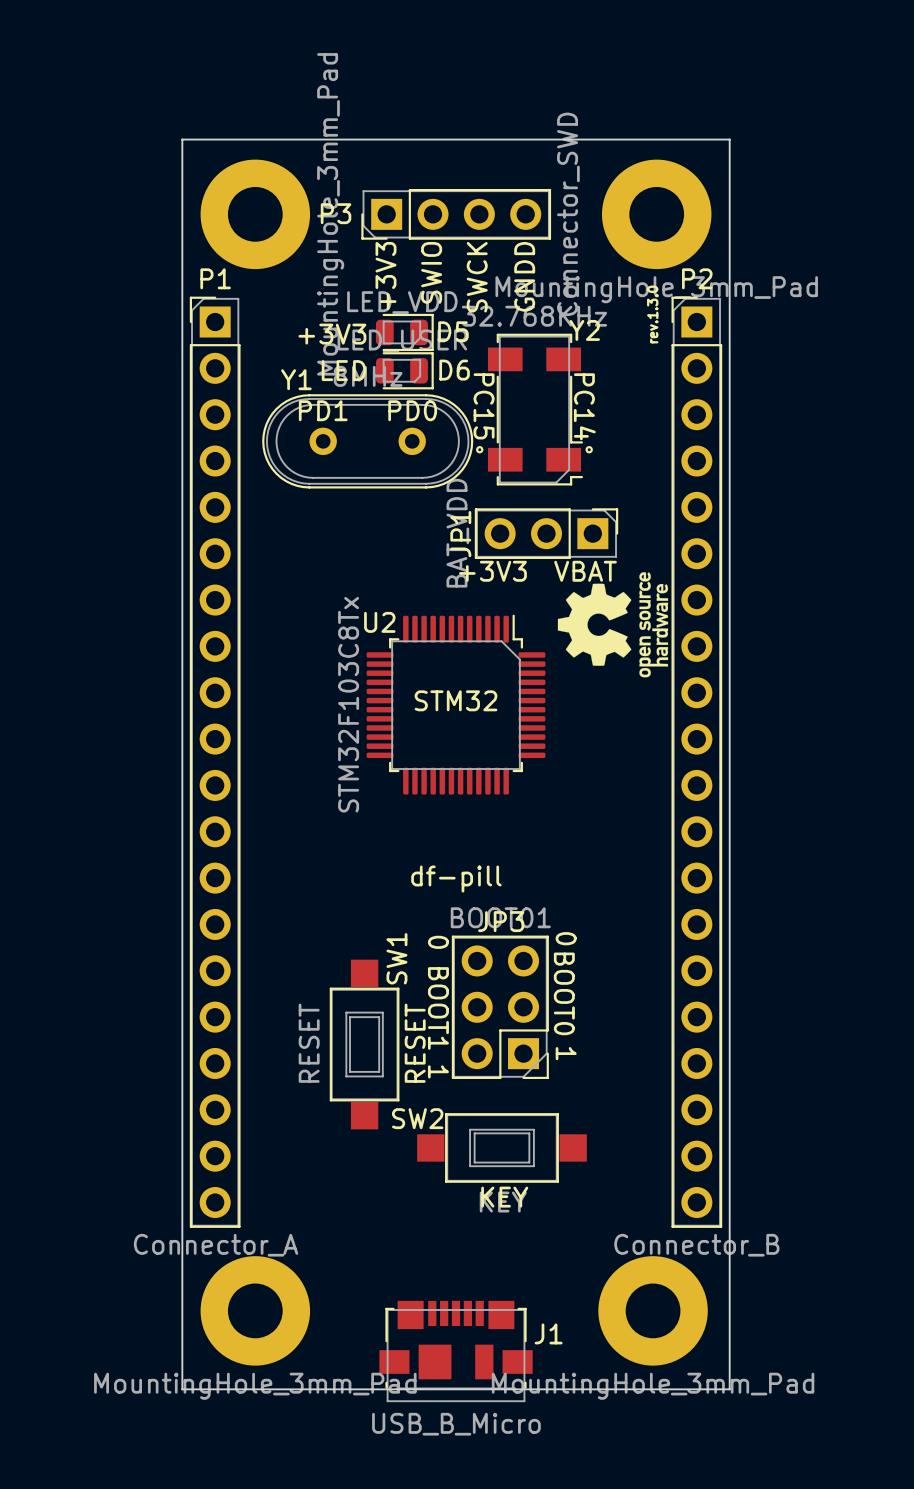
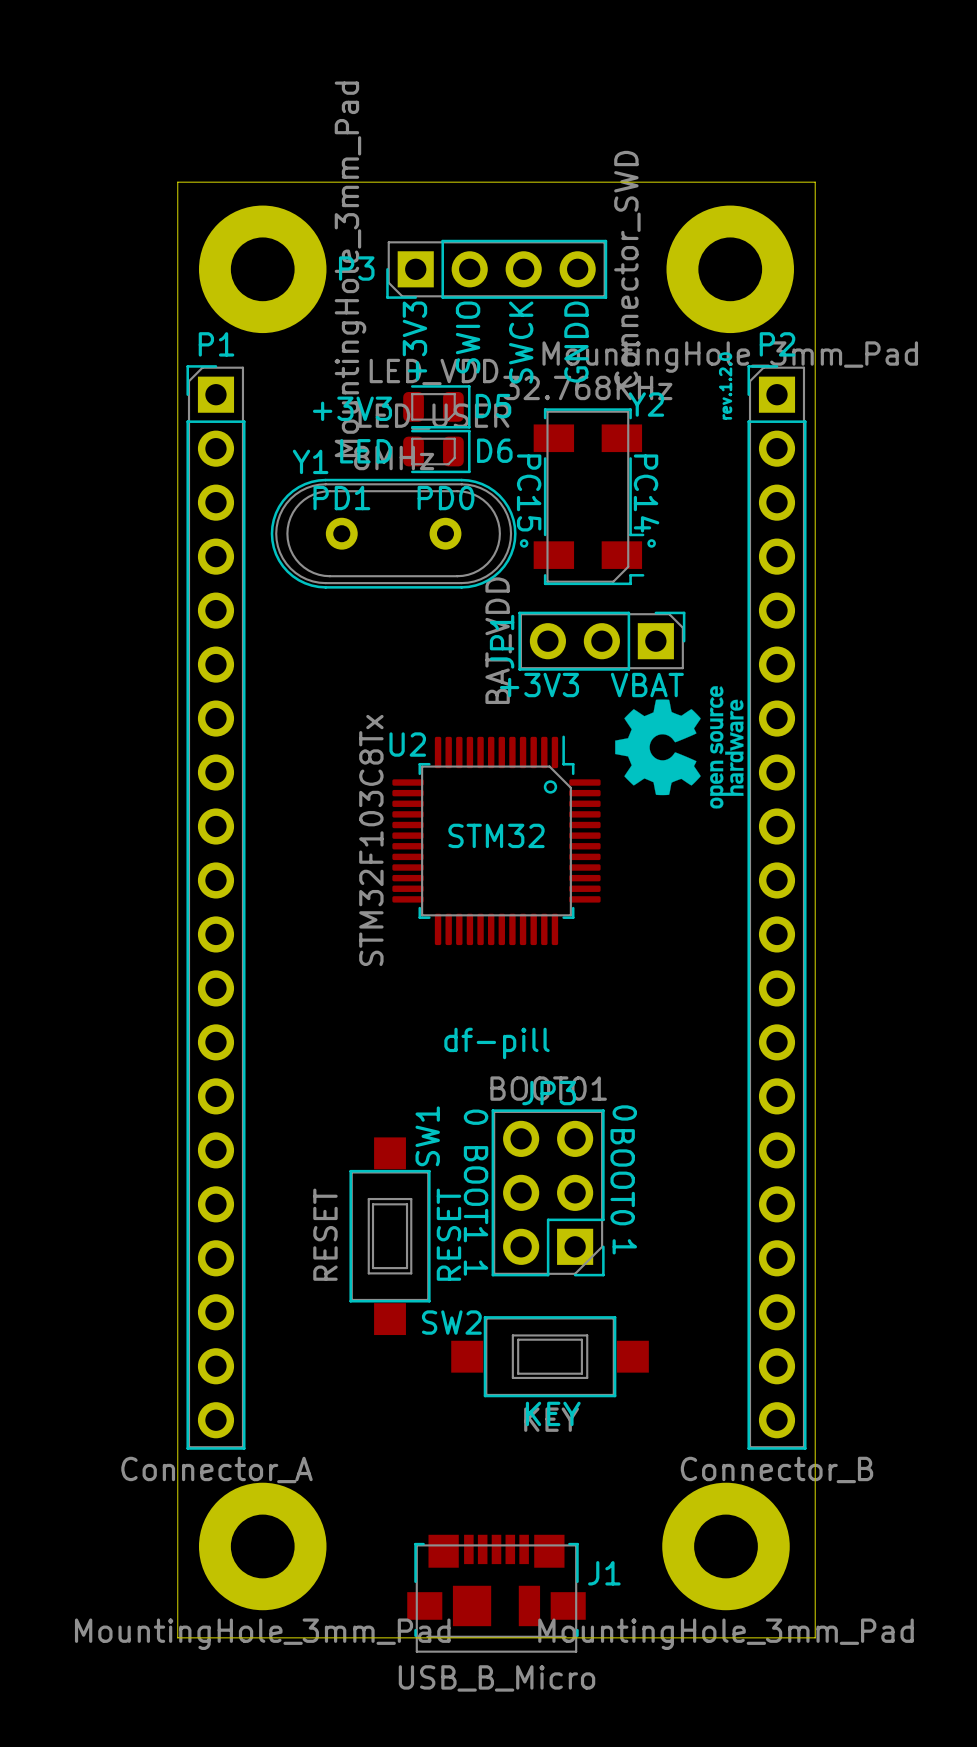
text: rev.1.3.0 (652, 314) -> rev.1.2.0 (725, 385)
U2 footprint: [366, 614, 546, 795] -> [392, 735, 601, 946]

